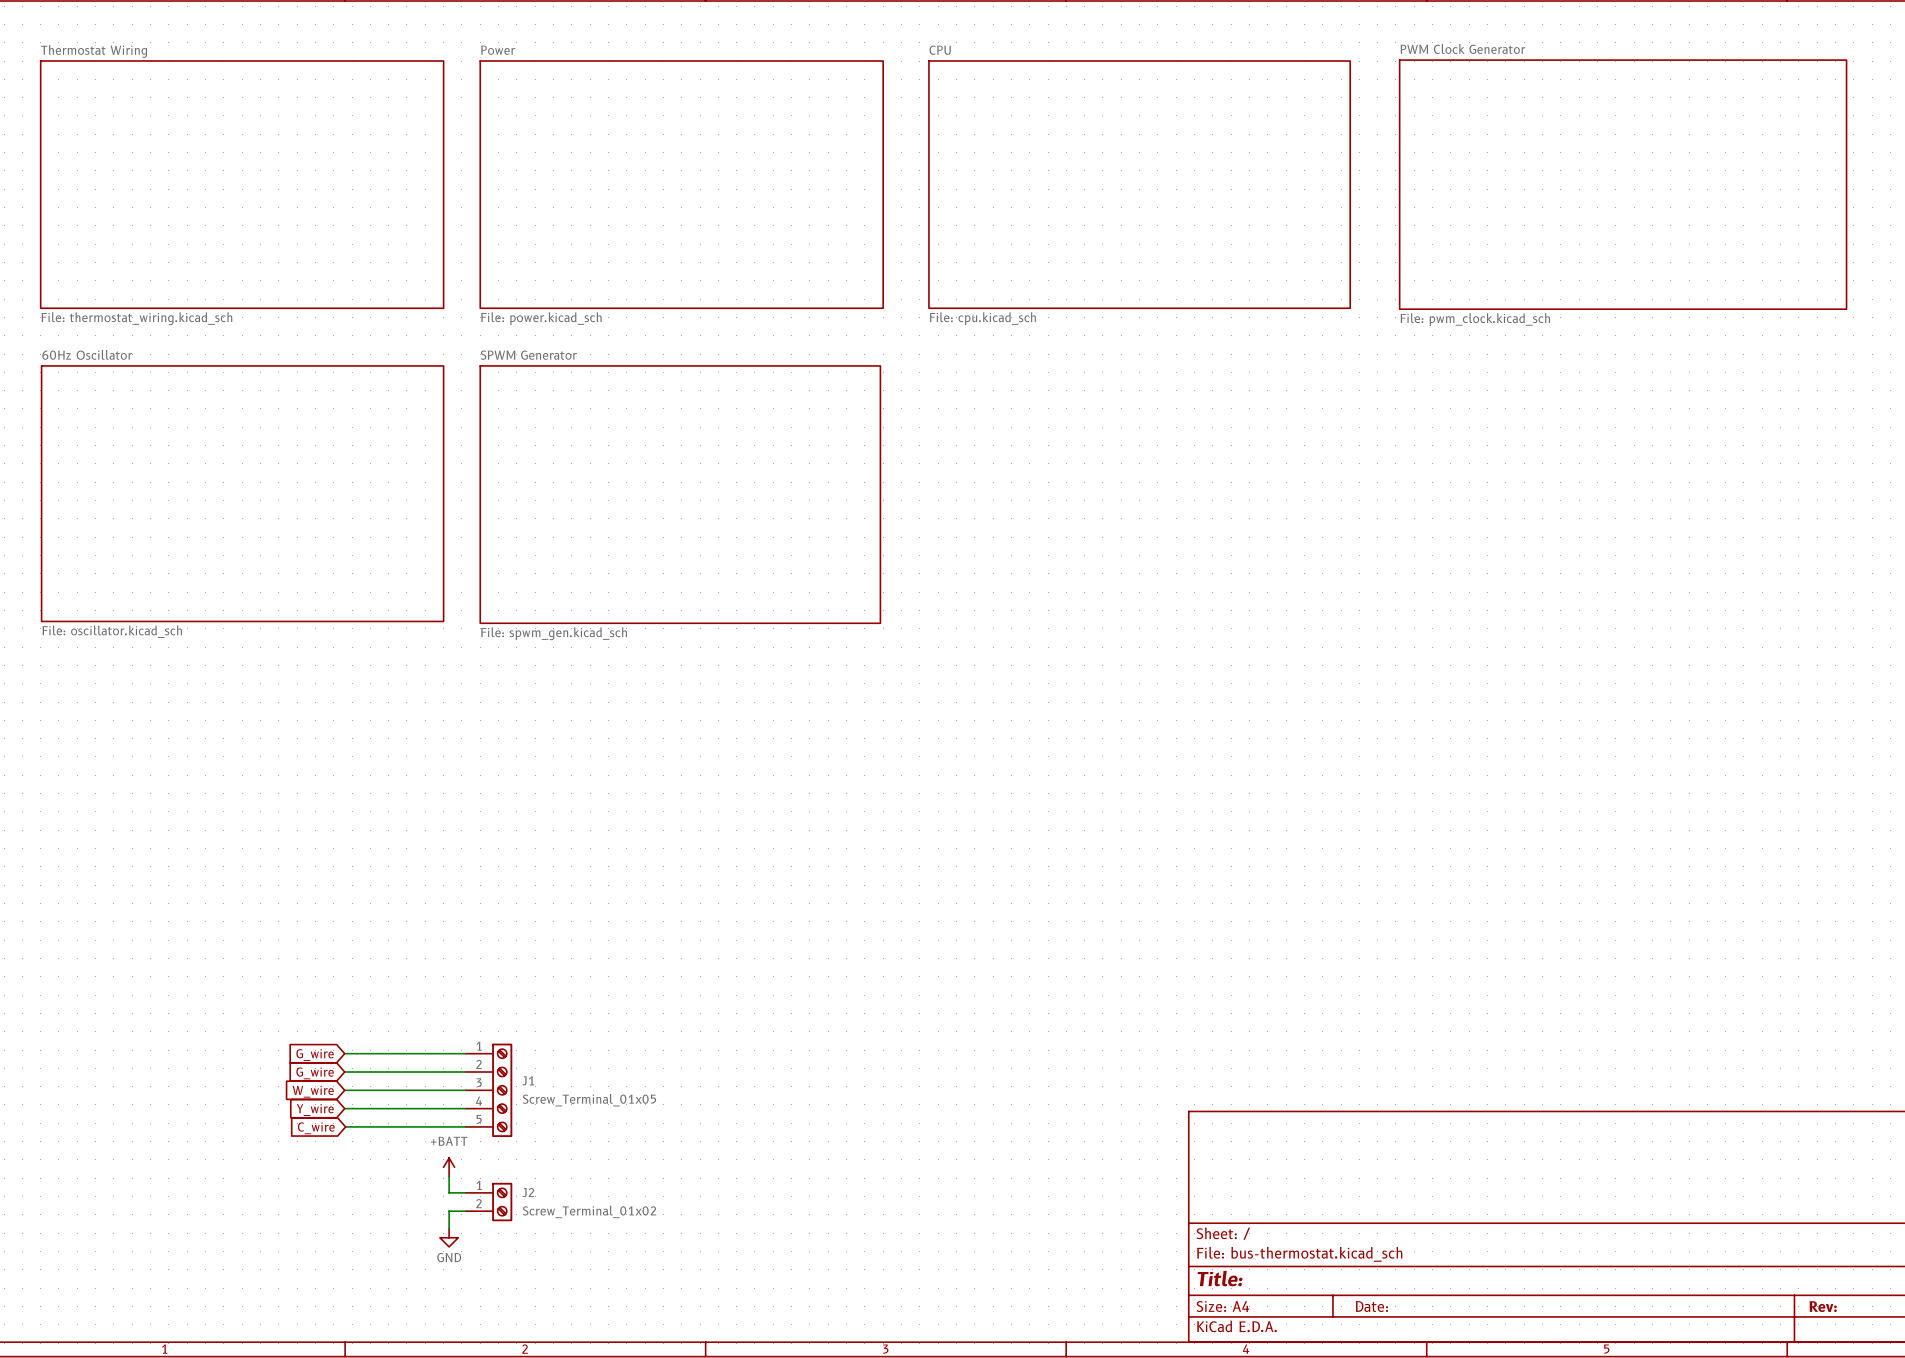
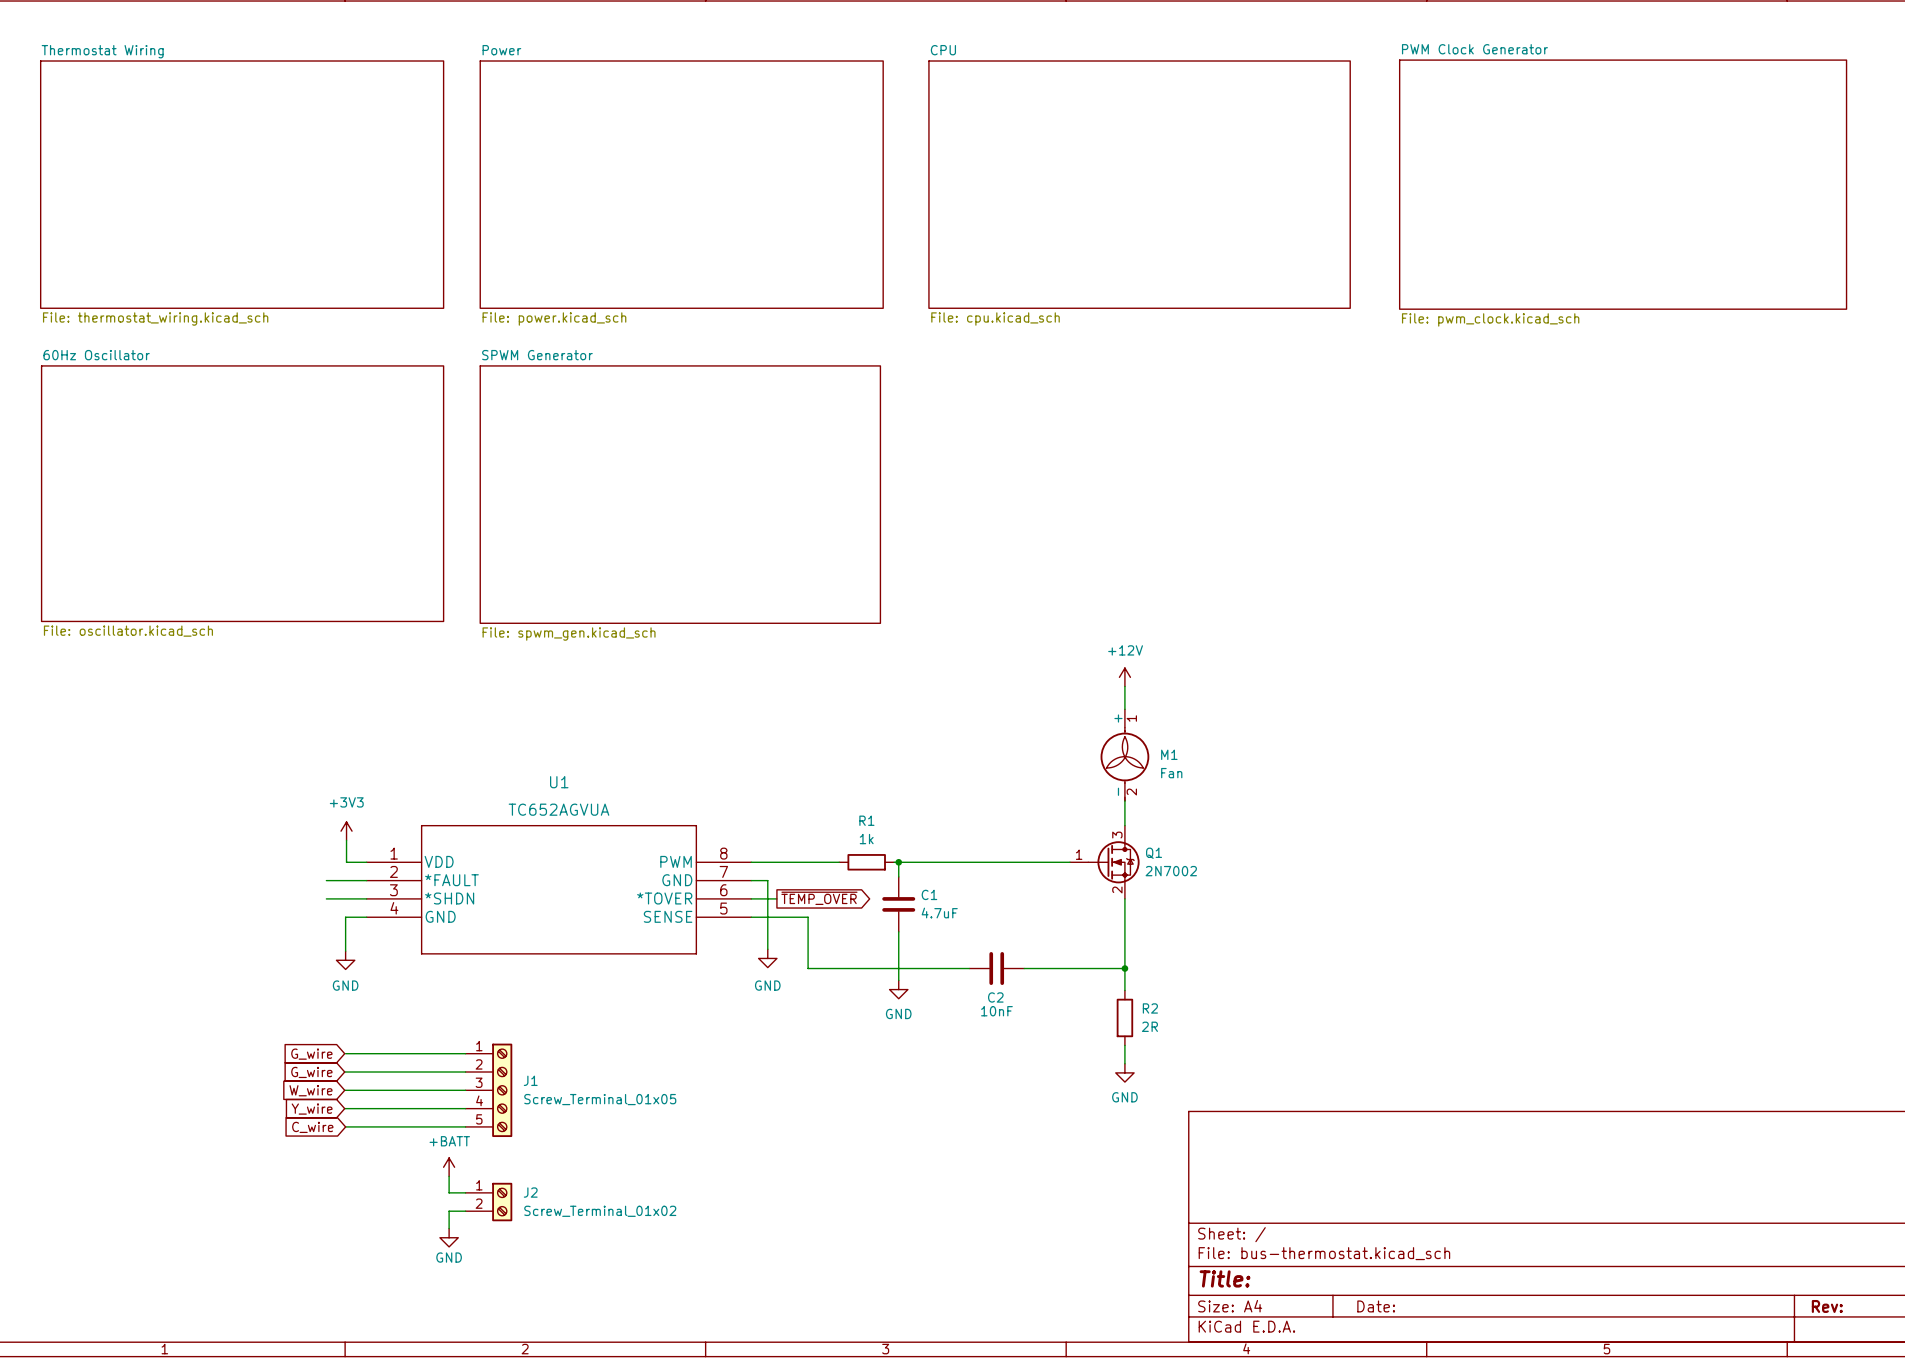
power symbol: none -> +12V (1124, 677)
wire: none -> (1124, 686) (1124, 709)
M1: none -> Fan (1124, 755)
wire: none -> (1124, 800) (1124, 825)
power symbol: none -> +3V3 (346, 831)
wire: none -> (346, 840) (346, 862) (366, 862)
wire: none -> (751, 862) (839, 862)
R1: none -> 1k (866, 862)
wire: none -> (894, 862) (1069, 862)
wire: none -> (898, 862) (898, 876)
junction: none -> (898, 862)
Q1: none -> 2N7002 (1104, 862)
wire: none -> (326, 880) (366, 880)
wire: none -> (751, 880) (767, 880) (767, 949)
U1: none -> TC652AGVUA (558, 889)
wire: none -> (326, 898) (366, 898)
wire: none -> (751, 898) (776, 898)
wire: none -> (1124, 898) (1124, 990)
global label: none -> ~{TEMP_OVER} (819, 898)
C1: none -> 4.7uF (898, 904)
wire: none -> (366, 917) (345, 917) (345, 951)
wire: none -> (751, 917) (808, 917) (808, 968) (969, 968)
wire: none -> (898, 931) (898, 980)
power symbol: none -> GND (767, 958)
power symbol: none -> GND (345, 960)
C2: none -> 10nF (996, 968)
wire: none -> (1024, 968) (1124, 968)
junction: none -> (1124, 968)
power symbol: none -> GND (898, 989)
R2: none -> 2R (1124, 1017)
wire: none -> (1124, 1045) (1124, 1063)
power symbol: none -> GND (1124, 1072)

